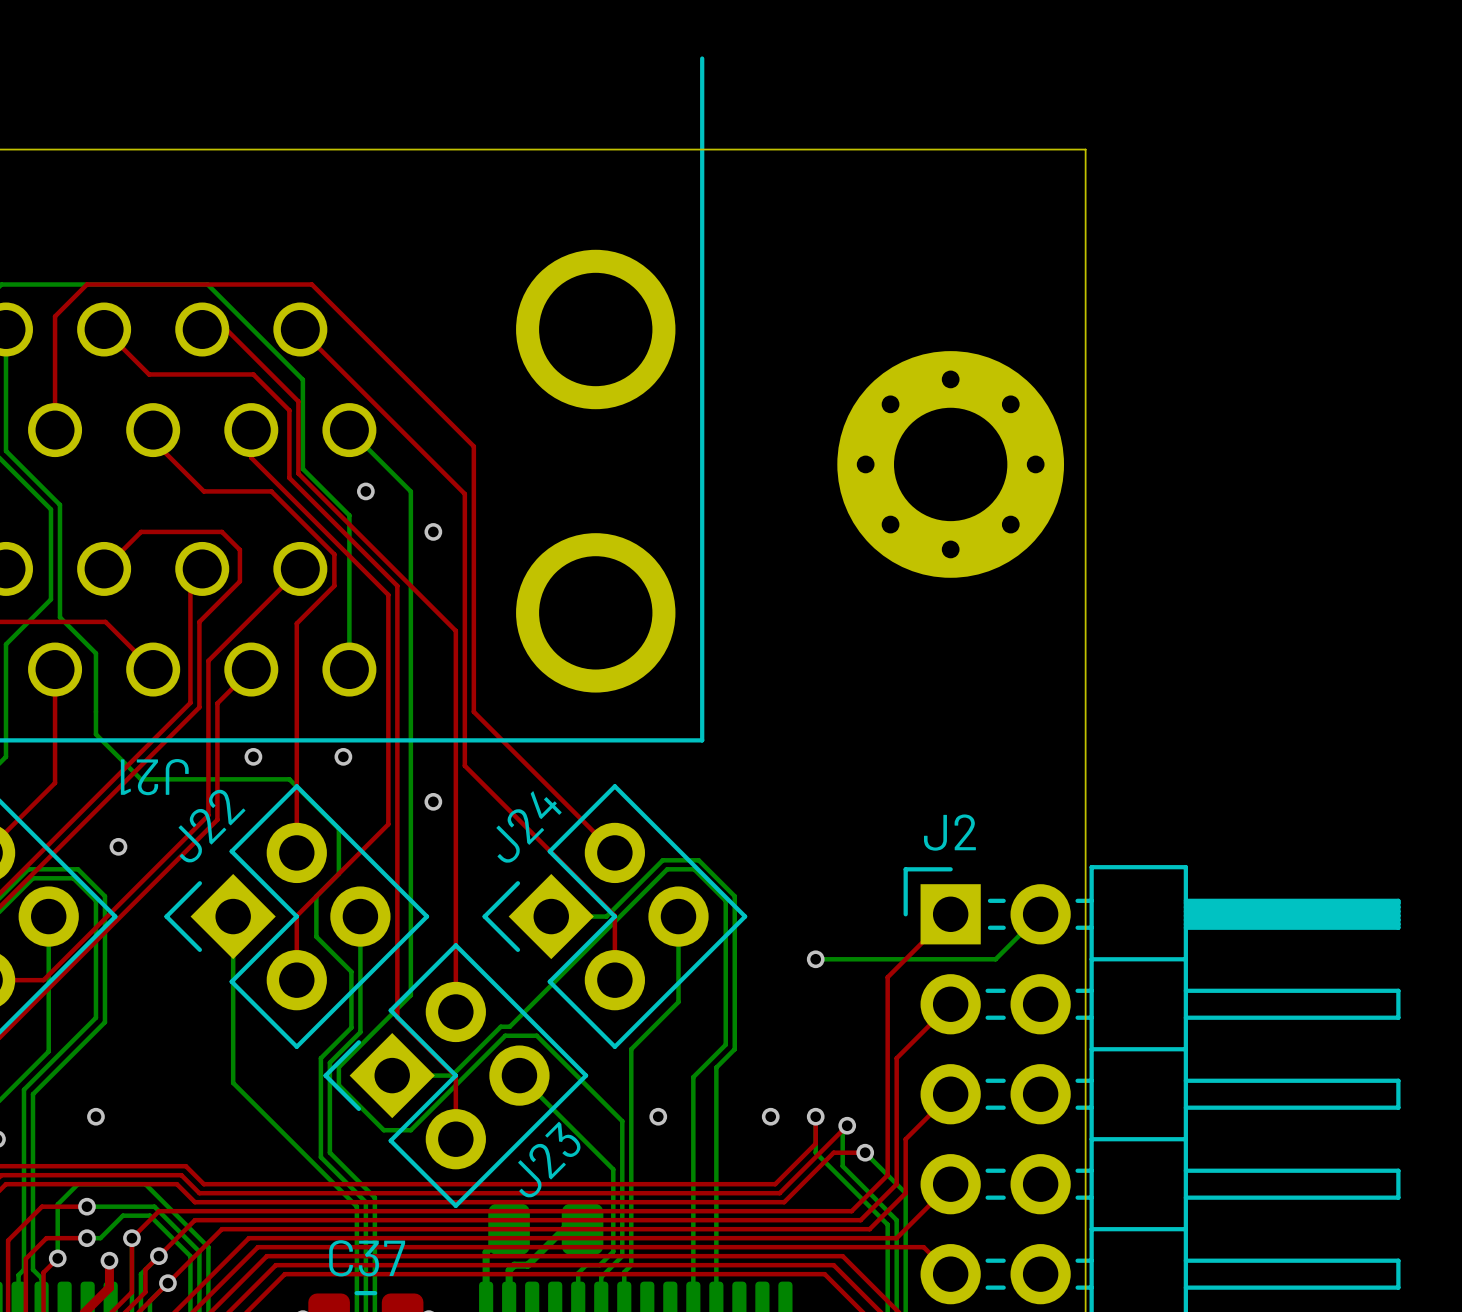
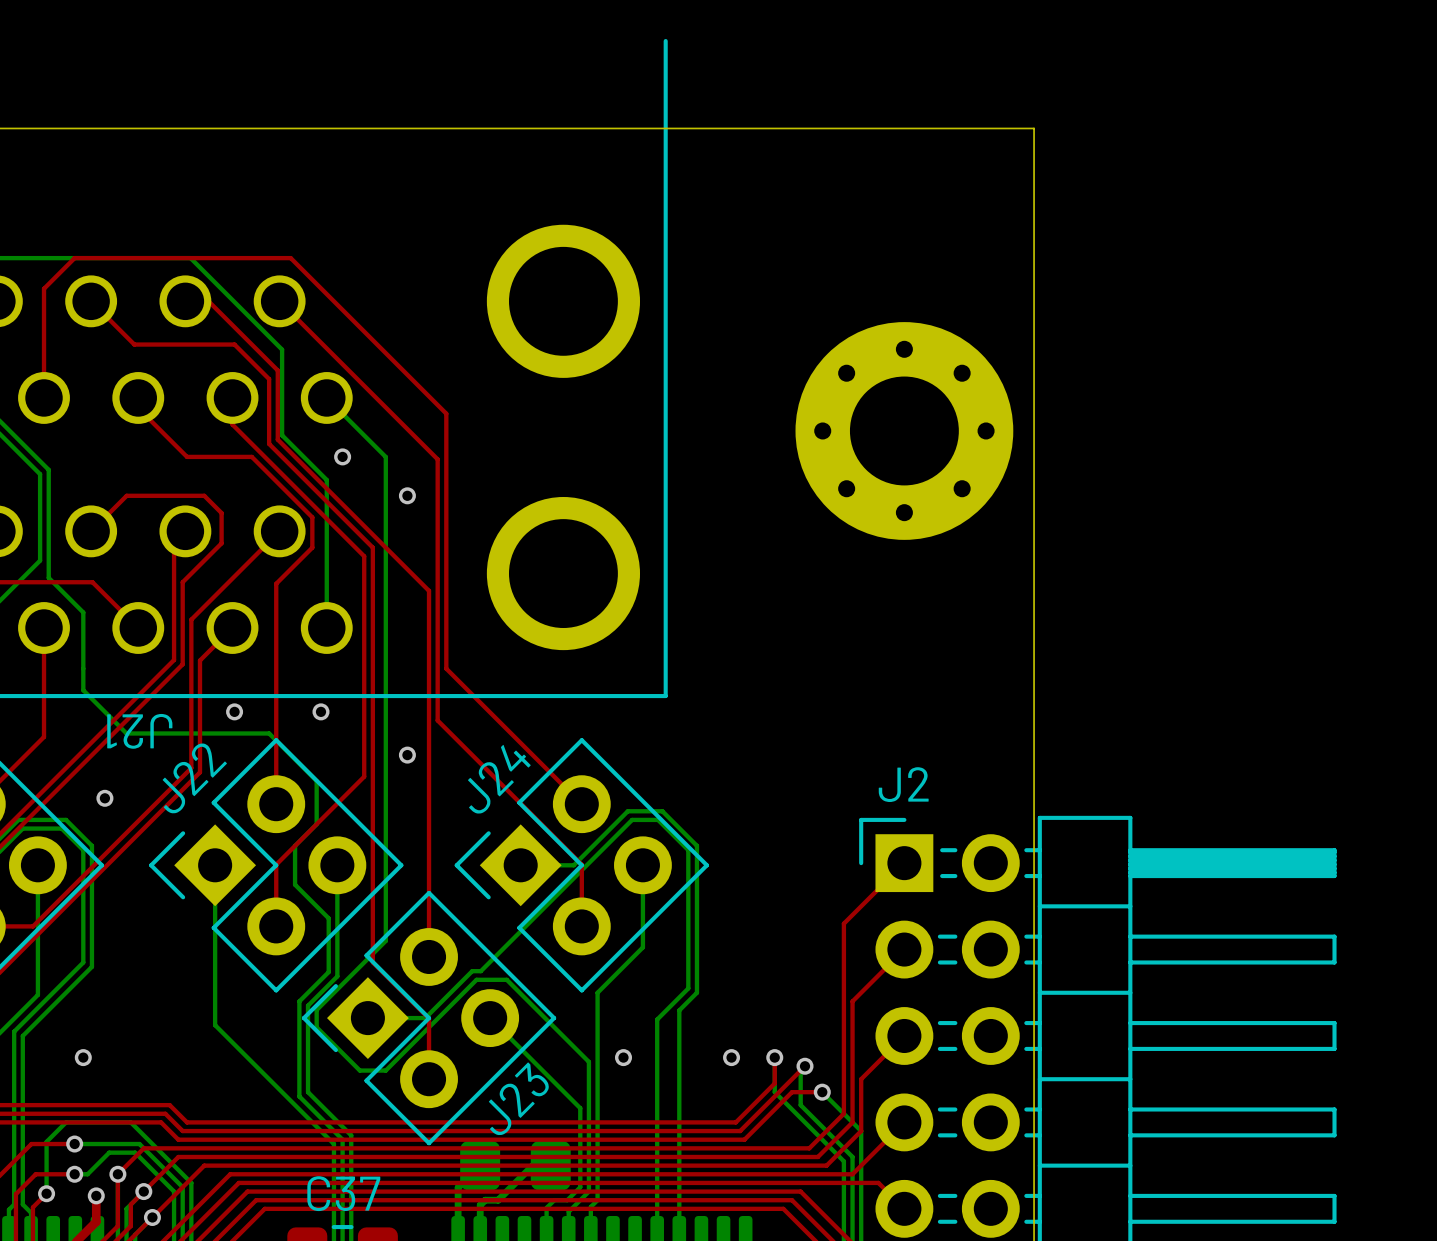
bottom track: (1040, 914) (995, 959) (815, 959) -> none
via: (815, 959) -> none

